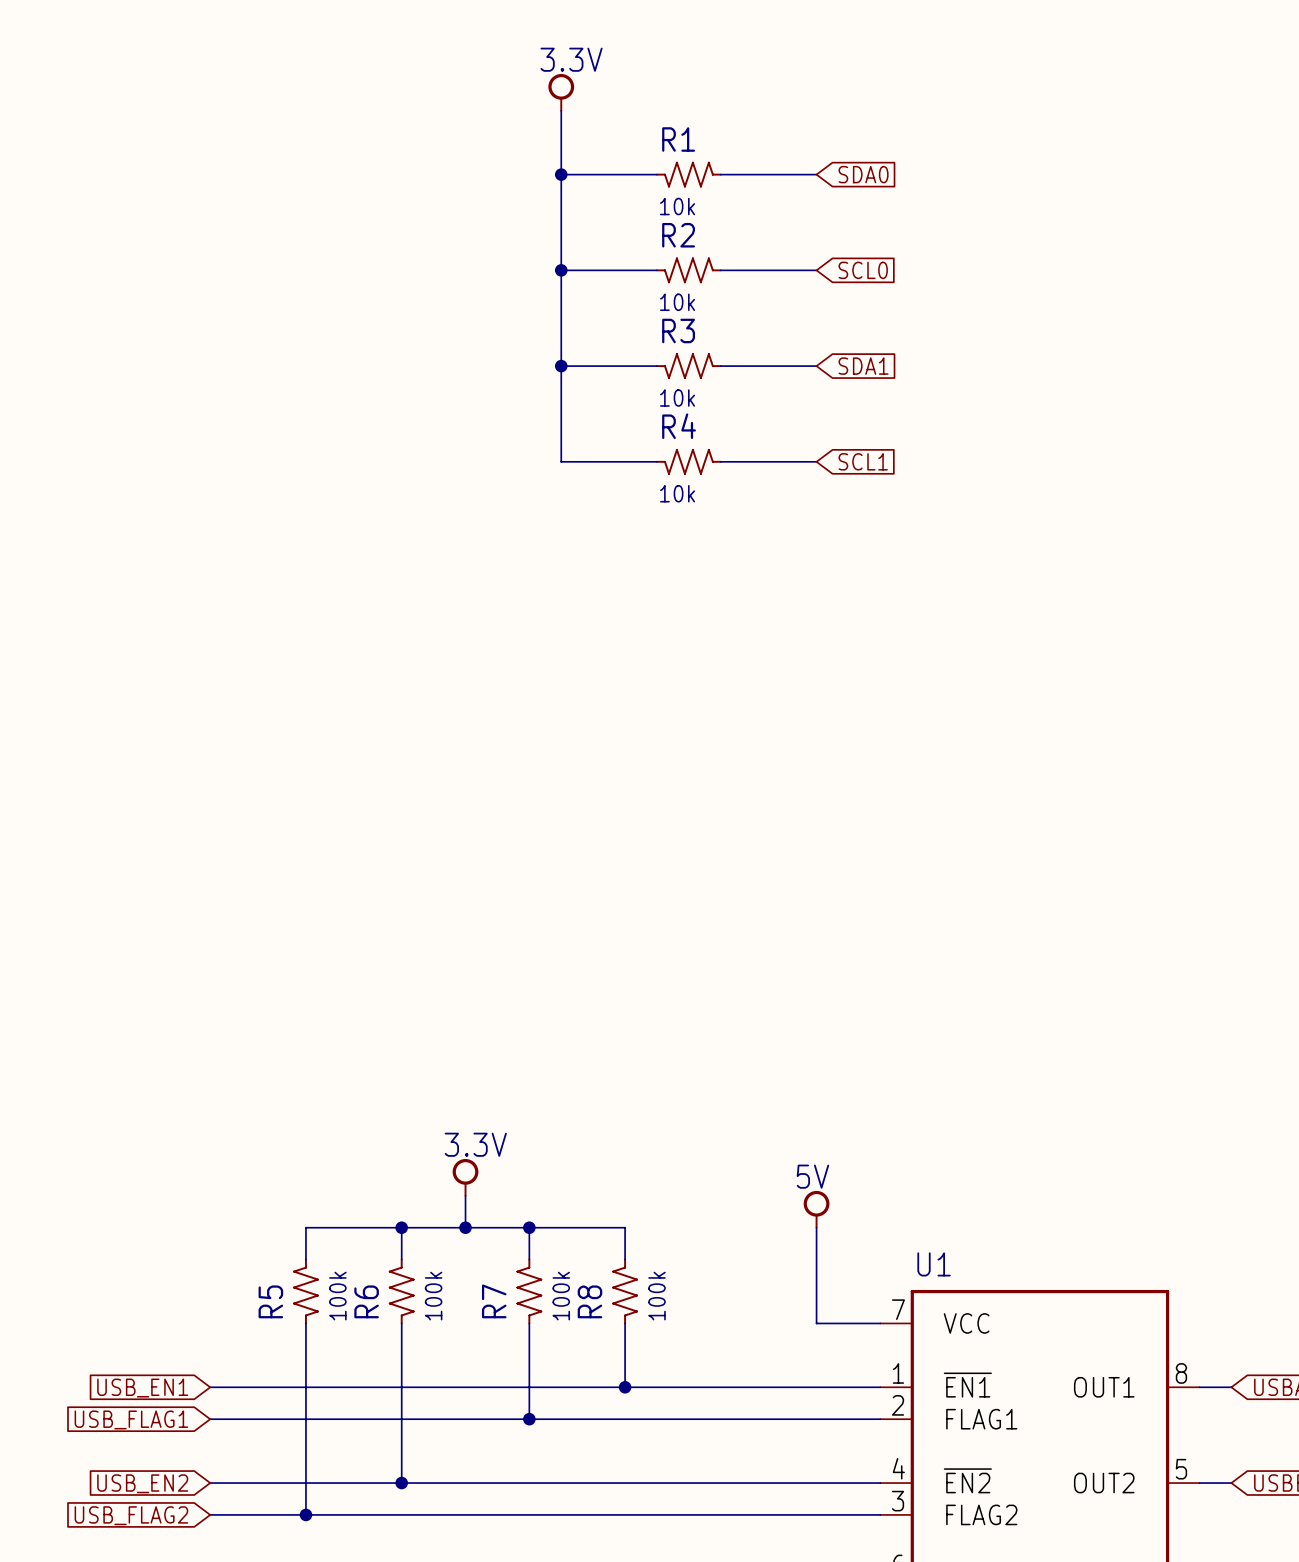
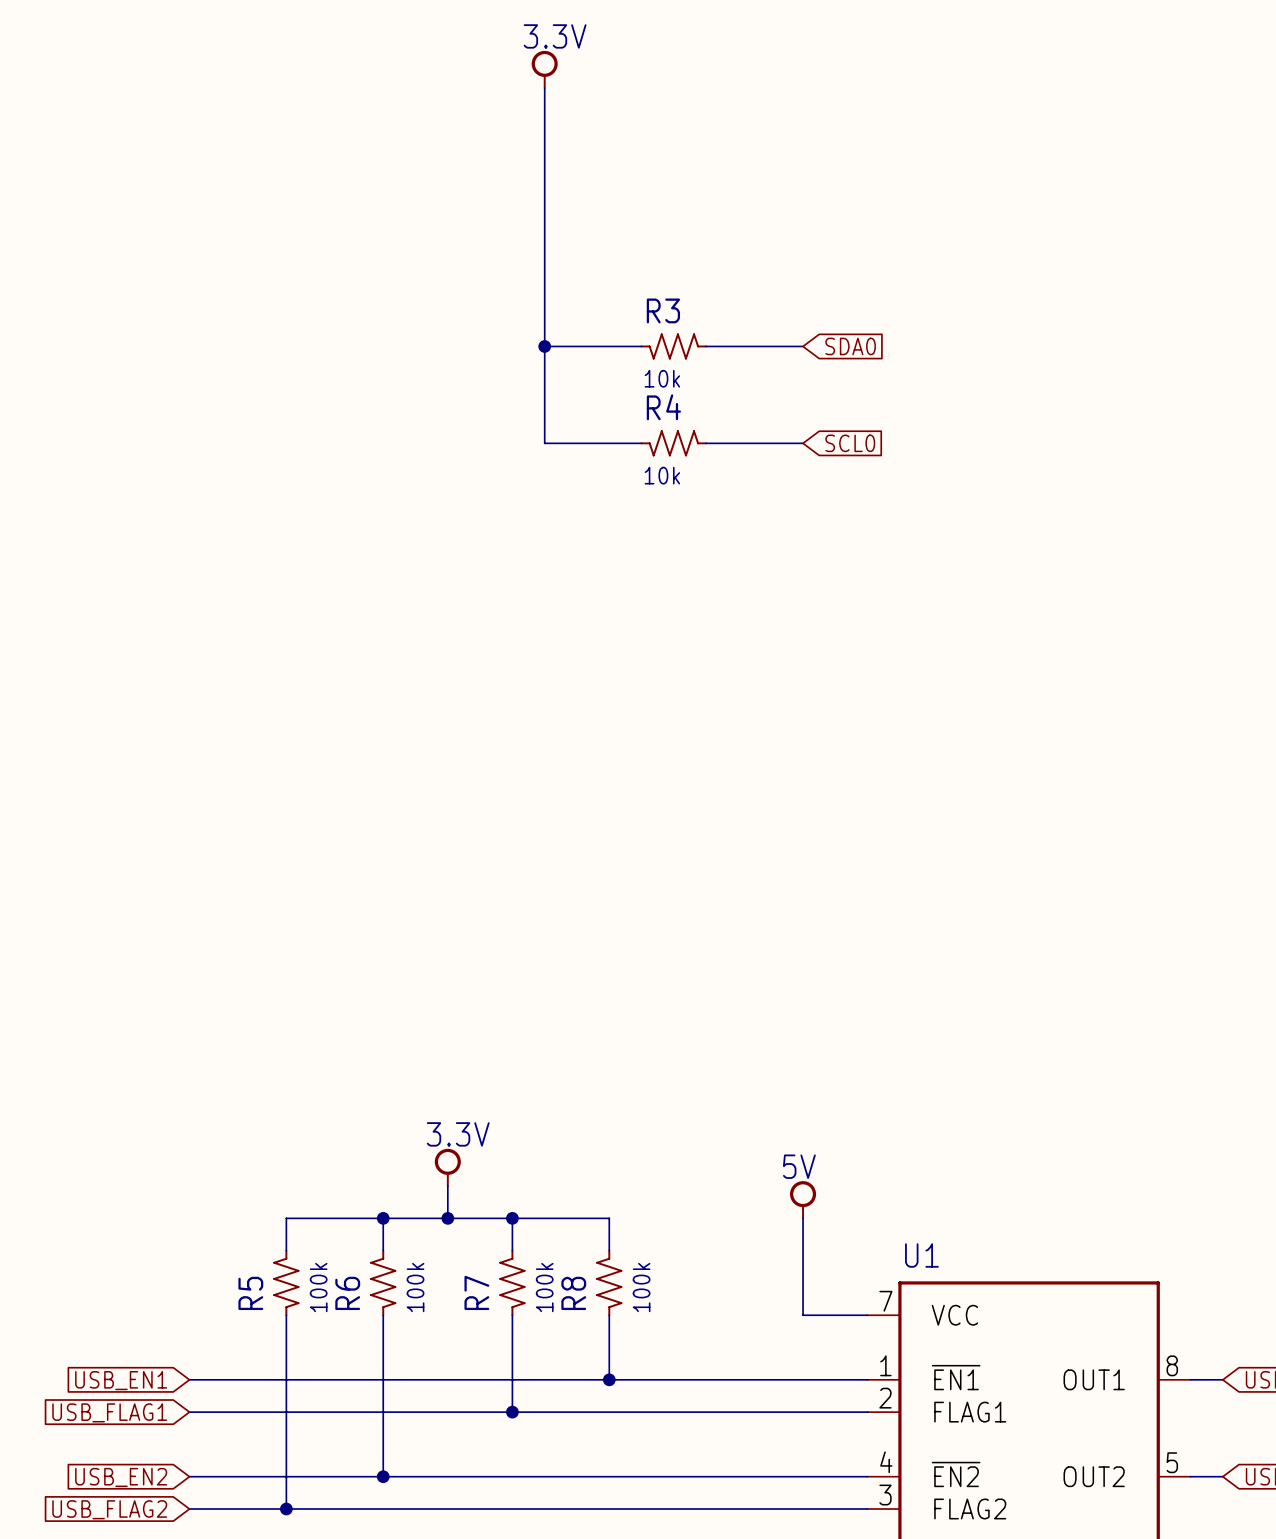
wire: (561, 174) (656, 174) -> none
junction: (561, 174) -> none
R1: 10k (688, 174) -> none
wire: (720, 174) (816, 174) -> none
global label: SDA0 (863, 174) -> none
wire: (561, 270) (656, 270) -> none
junction: (561, 270) -> none
R2: 10k (688, 270) -> none
wire: (720, 270) (816, 270) -> none
global label: SCL0 (863, 270) -> none
global label: SDA1 (863, 366) -> SDA0 (850, 346)
global label: SCL1 (863, 461) -> SCL0 (850, 443)

